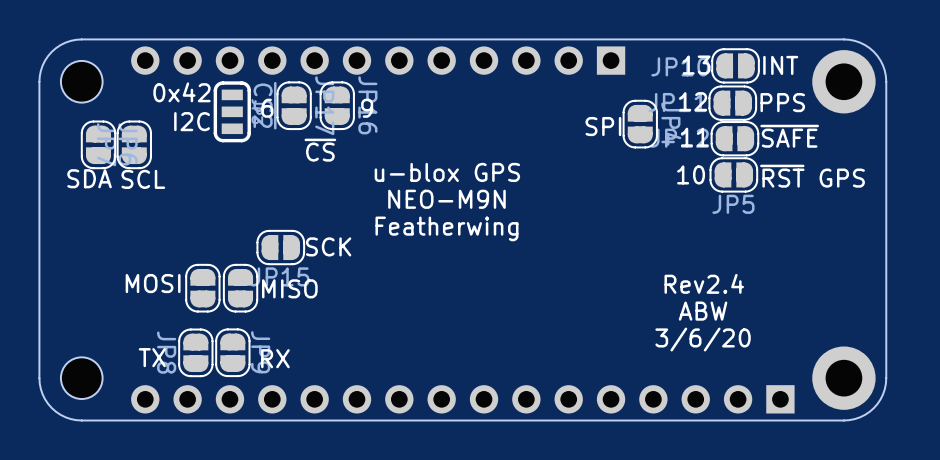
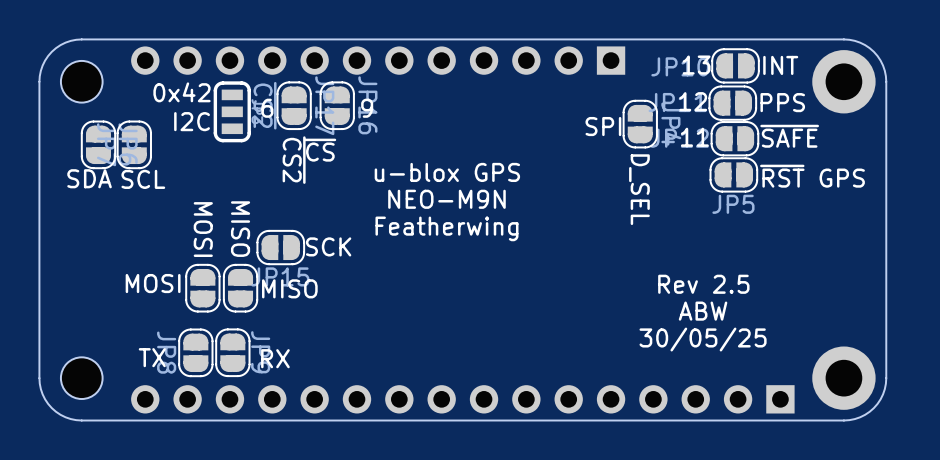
text: none -> ~{CS2} (294, 160)
text: 10 (691, 174) -> none
text: none -> D_SEL (639, 189)
text: none -> MOSI (203, 229)
text: none -> MISO (240, 229)
text: Rev2.4 (704, 283) -> Rev 2.5 (703, 284)
text: 3/6/20 (703, 339) -> 30/05/25 (703, 339)

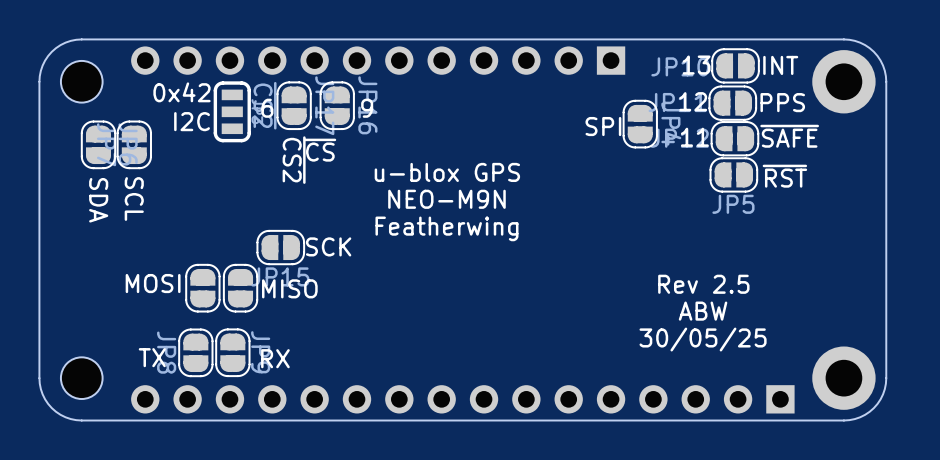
JP5 value: ~{RST} GPS (812, 176) -> ~{RST} (784, 176)
part value rotation: 0° (89, 178) -> 90° clockwise (98, 200)
part value rotation: 0° (143, 179) -> 90° clockwise (134, 199)
text: D_SEL (639, 189) -> none
text: MOSI (203, 229) -> none
text: MISO (240, 229) -> none

